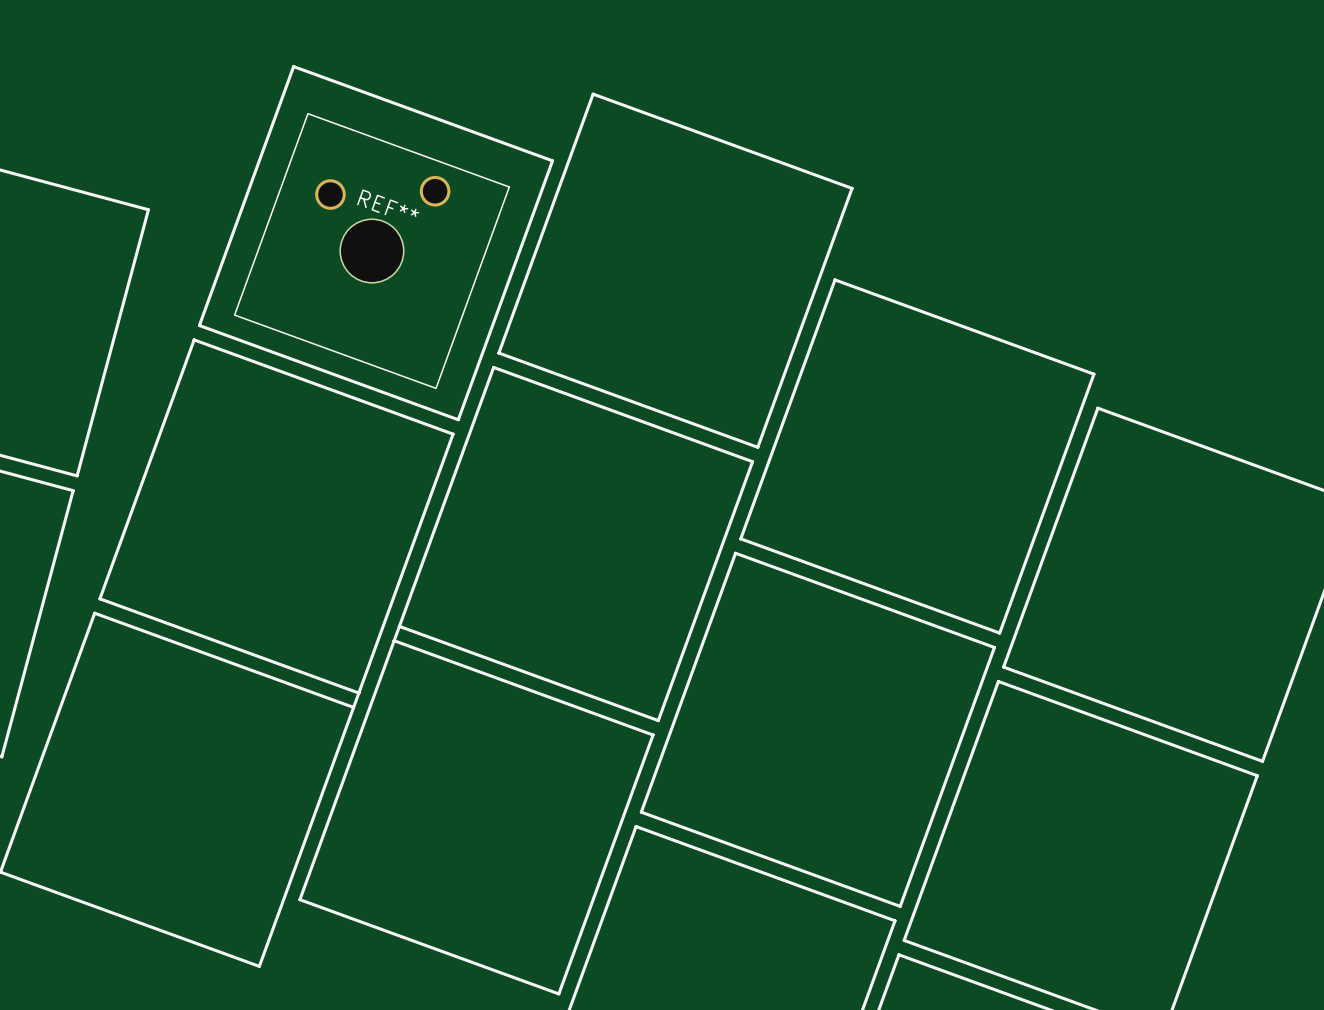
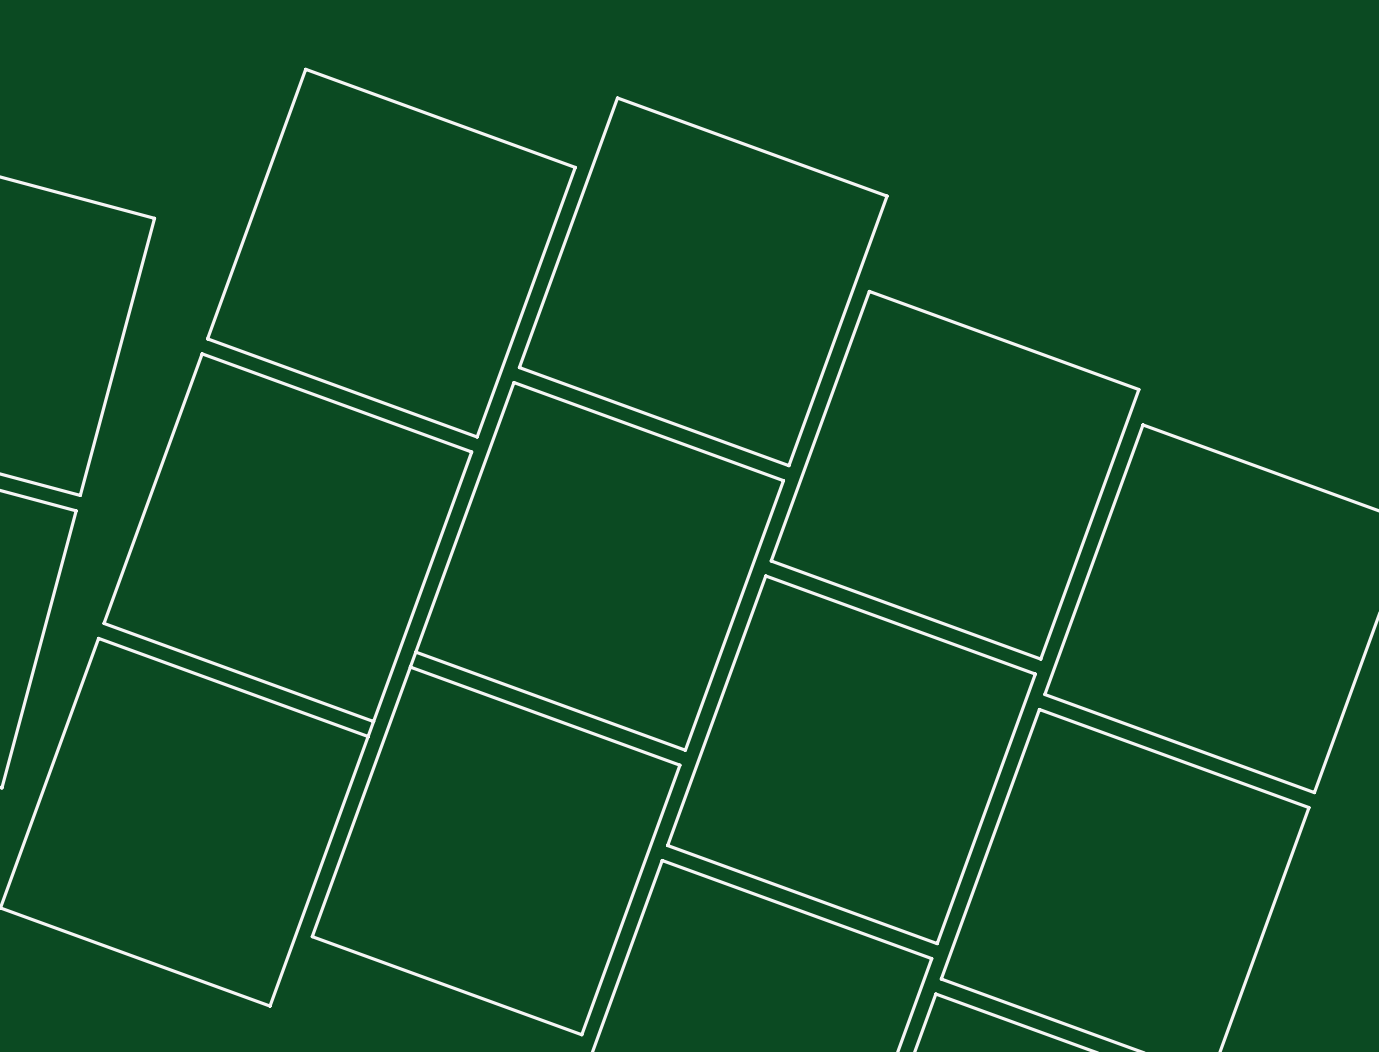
REF**: (371, 251) -> none

